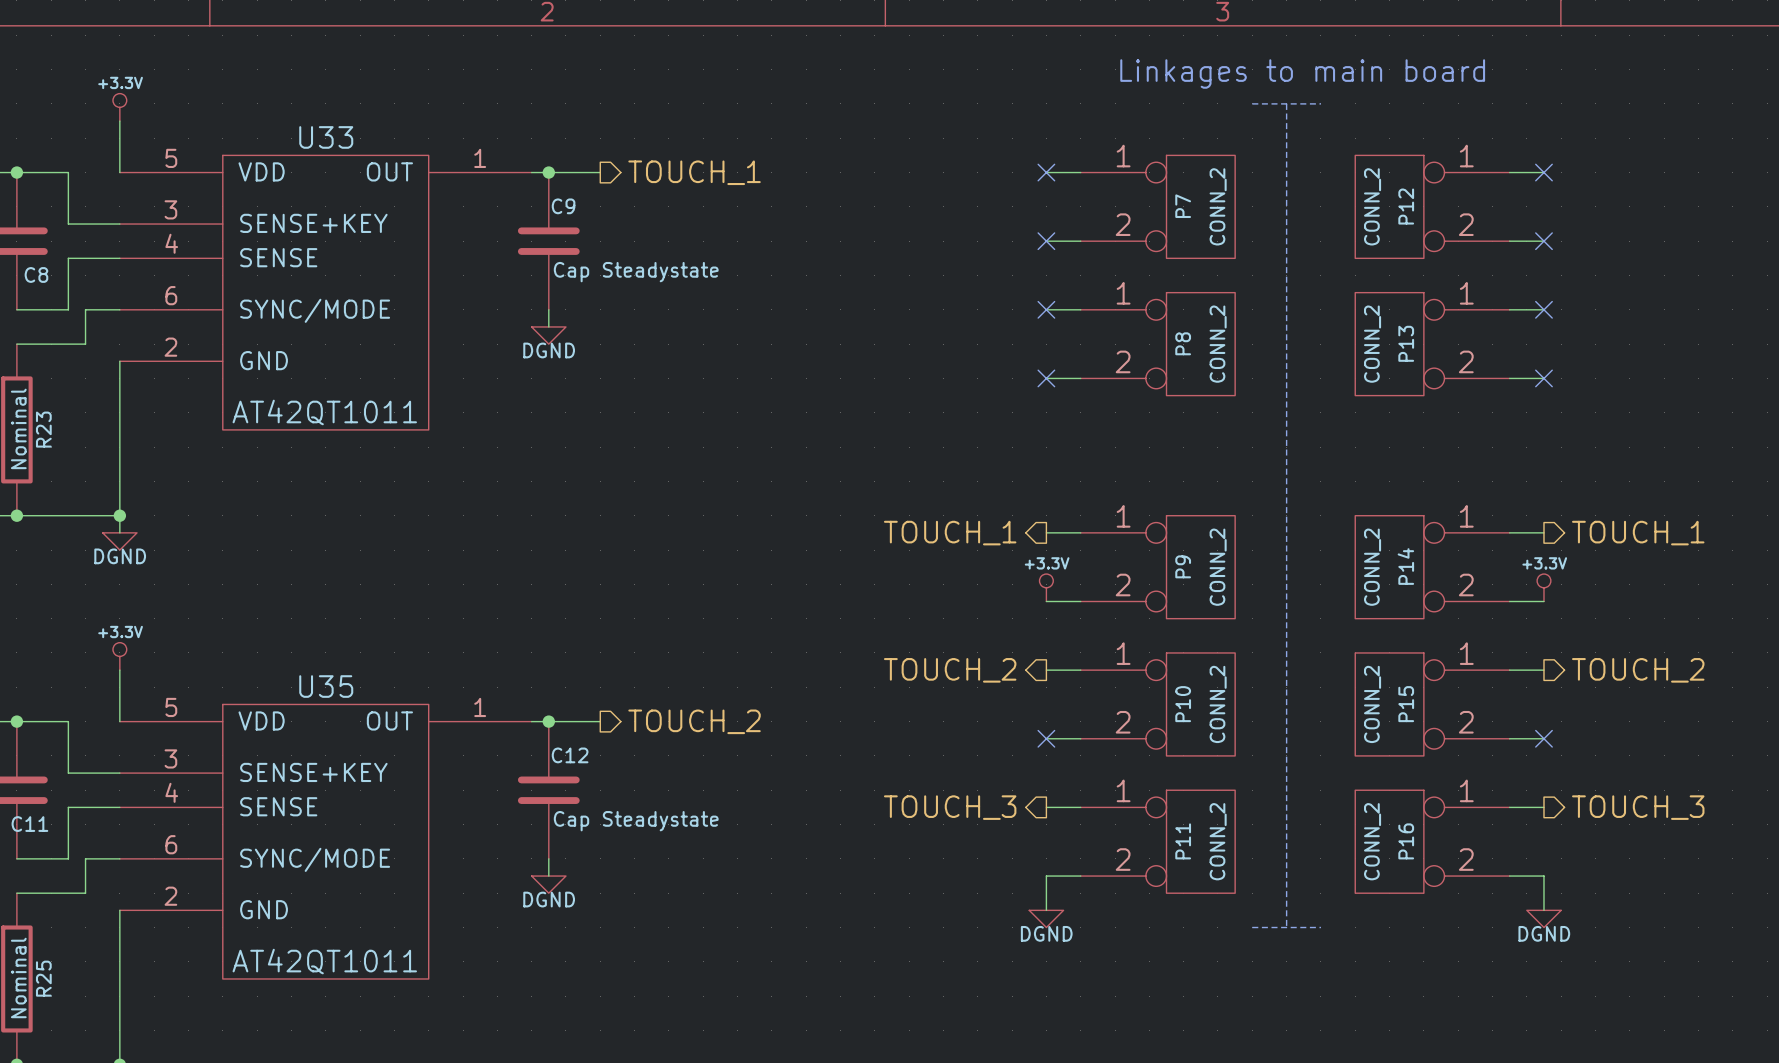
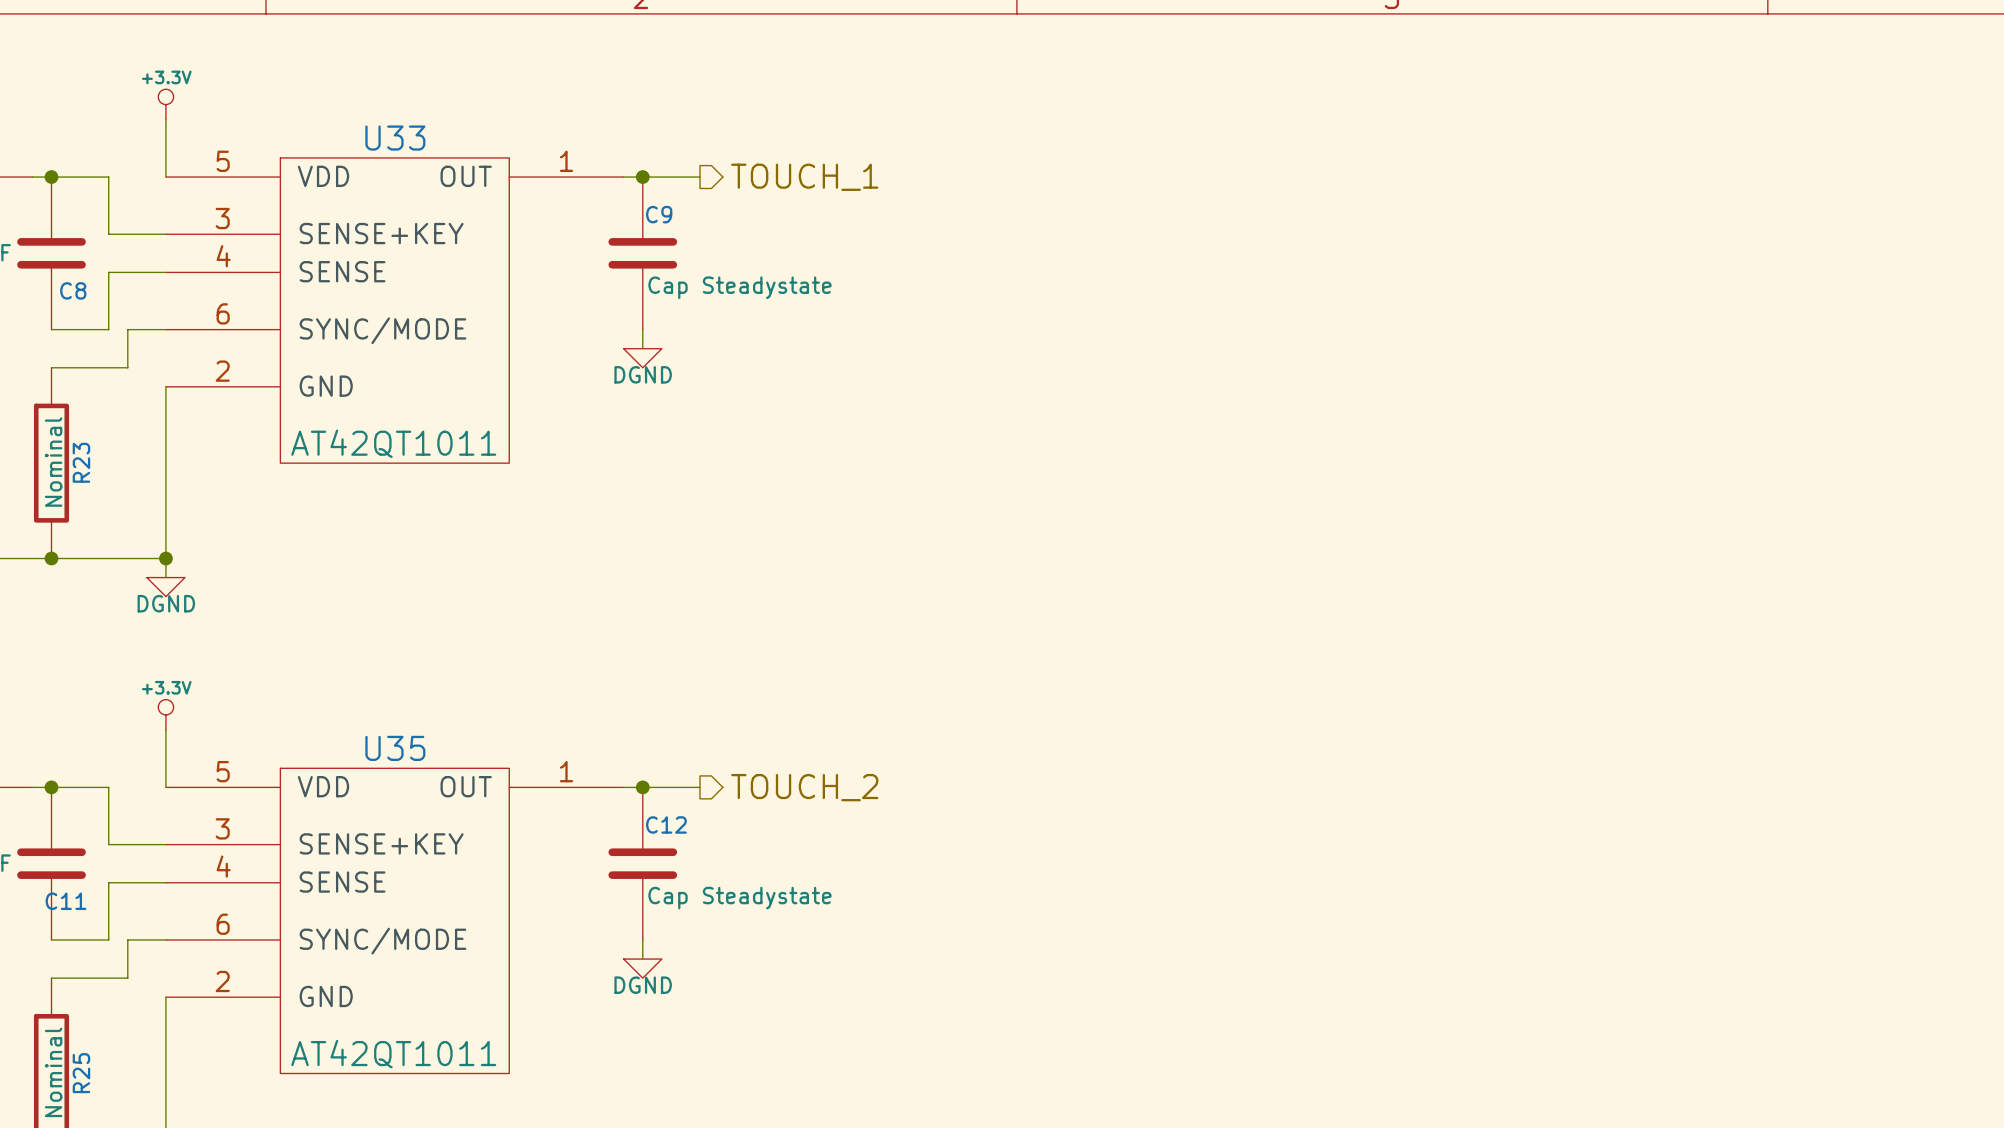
text: Linkages to main board (1302, 73) -> none
line: (1252, 103) (1320, 103) -> none
line: (1286, 103) (1286, 927) -> none
wire: (1046, 172) (1080, 172) -> none
no-connect mark: (1046, 172) -> none
wire: (1509, 172) (1543, 172) -> none
no-connect mark: (1543, 172) -> none
P7: CONN_2 (1157, 206) -> none
P12: CONN_2 (1432, 206) -> none
wire: (1046, 241) (1080, 241) -> none
no-connect mark: (1046, 241) -> none
wire: (1509, 241) (1543, 241) -> none
no-connect mark: (1543, 241) -> none
wire: (1046, 309) (1080, 309) -> none
no-connect mark: (1046, 309) -> none
wire: (1509, 309) (1543, 309) -> none
no-connect mark: (1543, 309) -> none
P8: CONN_2 (1157, 344) -> none
P13: CONN_2 (1432, 344) -> none
wire: (1046, 378) (1080, 378) -> none
no-connect mark: (1046, 378) -> none
wire: (1509, 378) (1543, 378) -> none
no-connect mark: (1543, 378) -> none
wire: (1046, 532) (1080, 532) -> none
wire: (1509, 532) (1543, 532) -> none
hierarchical label: TOUCH_1 (950, 533) -> none
hierarchical label: TOUCH_1 (1638, 533) -> none
P9: CONN_2 (1157, 567) -> none
P14: CONN_2 (1432, 567) -> none
power symbol: +3.3V (1046, 587) -> none
power symbol: +3.3V (1543, 587) -> none
wire: (1046, 601) (1080, 601) -> none
wire: (1509, 601) (1543, 601) -> none
hierarchical label: TOUCH_2 (950, 670) -> none
wire: (1046, 670) (1080, 670) -> none
wire: (1509, 670) (1543, 670) -> none
hierarchical label: TOUCH_2 (1638, 670) -> none
P10: CONN_2 (1157, 704) -> none
P15: CONN_2 (1432, 704) -> none
wire: (1046, 738) (1080, 738) -> none
no-connect mark: (1046, 738) -> none
wire: (1509, 738) (1543, 738) -> none
no-connect mark: (1543, 738) -> none
hierarchical label: TOUCH_3 (950, 807) -> none
wire: (1046, 807) (1080, 807) -> none
wire: (1509, 807) (1543, 807) -> none
hierarchical label: TOUCH_3 (1638, 807) -> none
P11: CONN_2 (1157, 841) -> none
P16: CONN_2 (1432, 841) -> none
wire: (1080, 876) (1046, 876) (1046, 910) -> none
wire: (1509, 876) (1543, 876) (1543, 910) -> none
power symbol: DGND (1046, 918) -> none
power symbol: DGND (1543, 918) -> none
line: (1252, 927) (1320, 927) -> none

